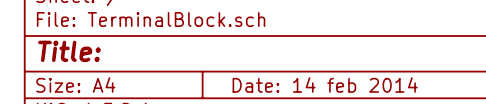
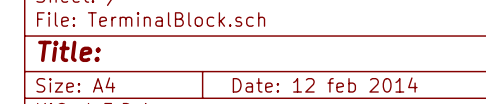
title block: Date: 14 feb 2014 (325, 85) -> Date: 12 feb 2014 (325, 85)

